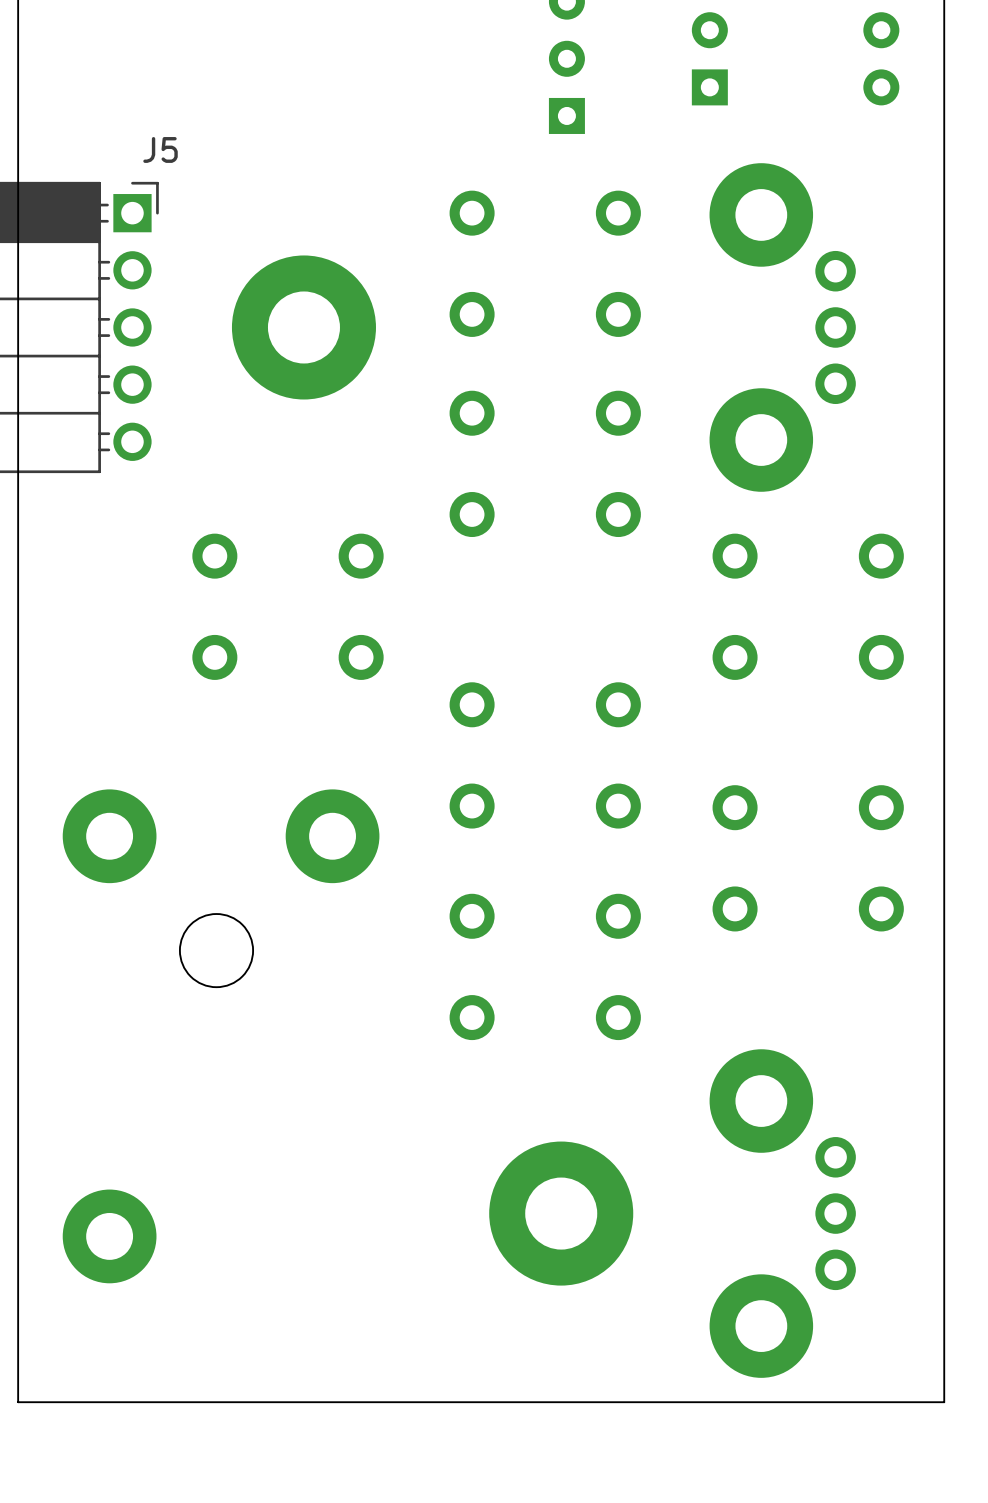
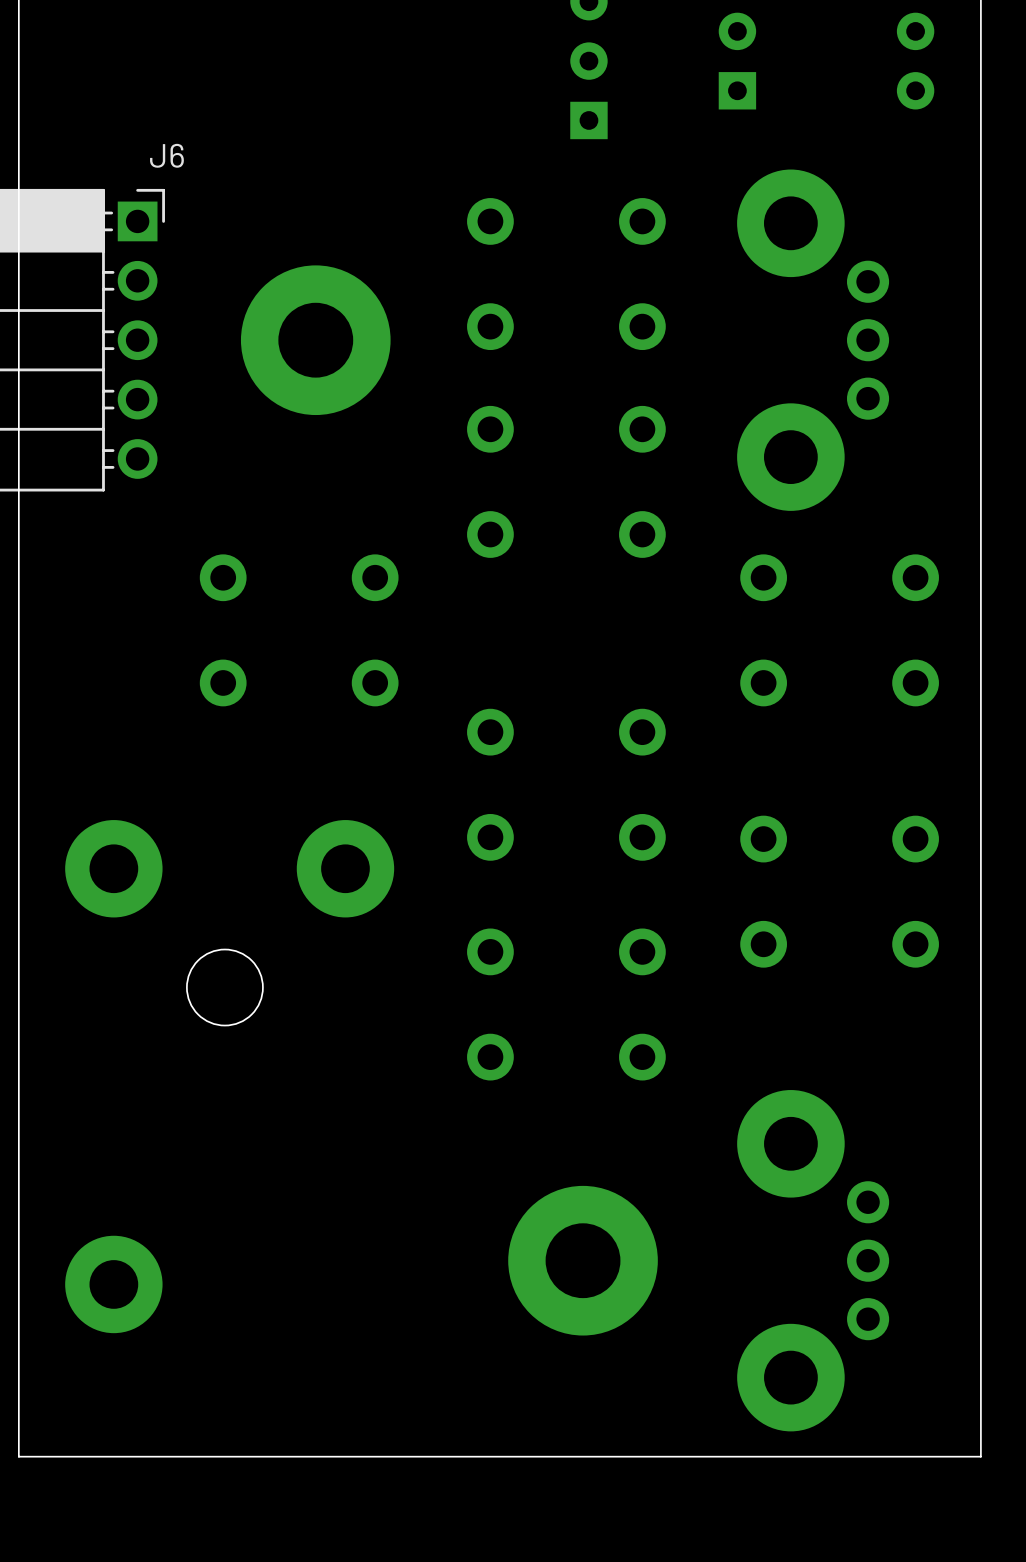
J5 name: J5 (160, 149) -> J6 (166, 155)

